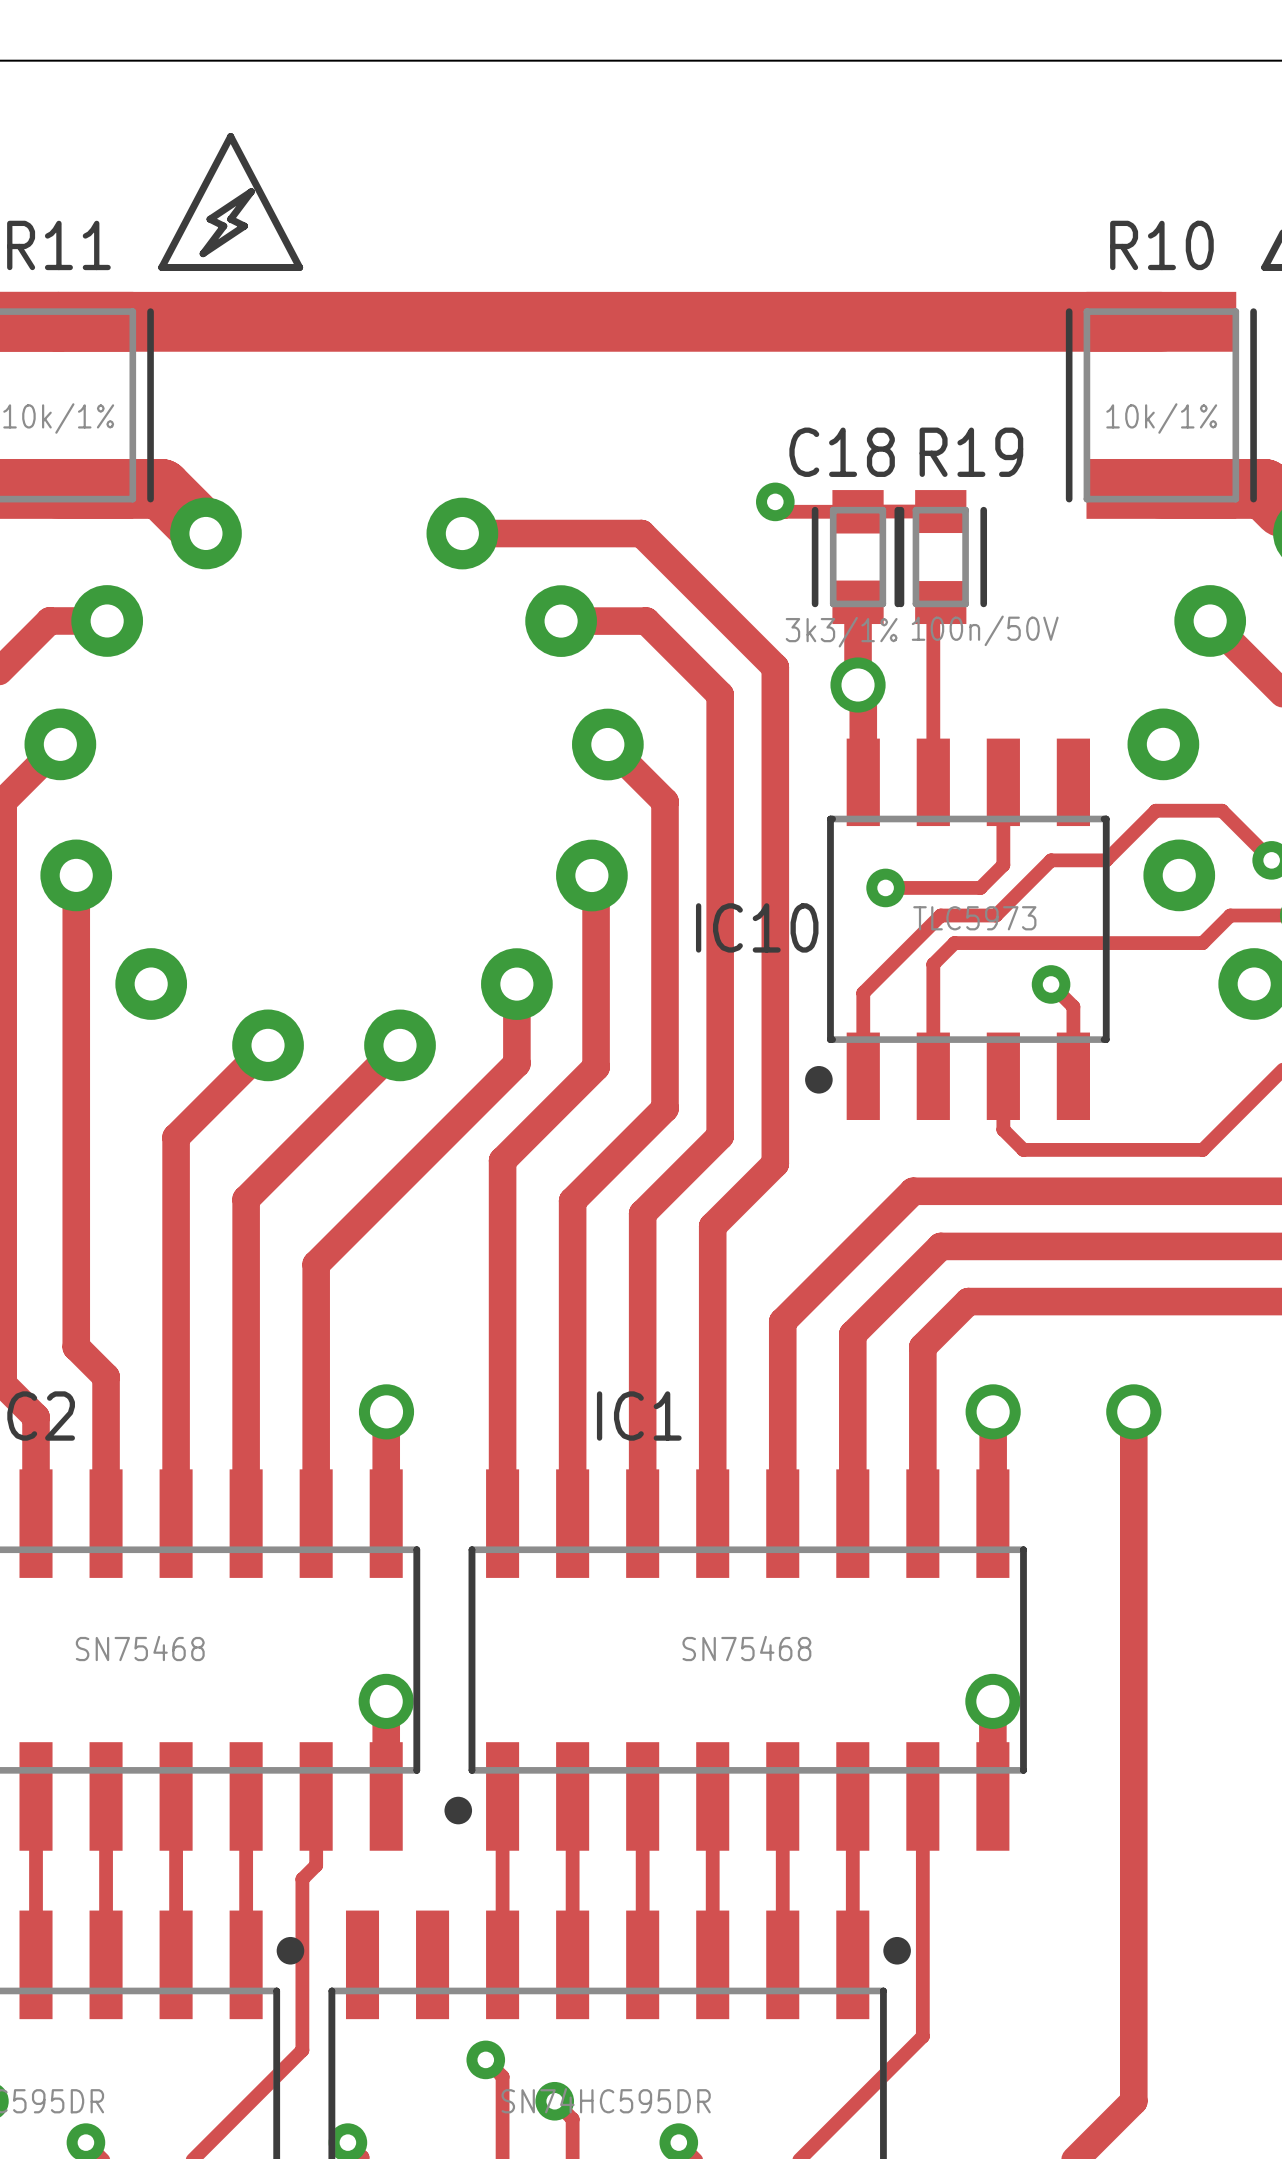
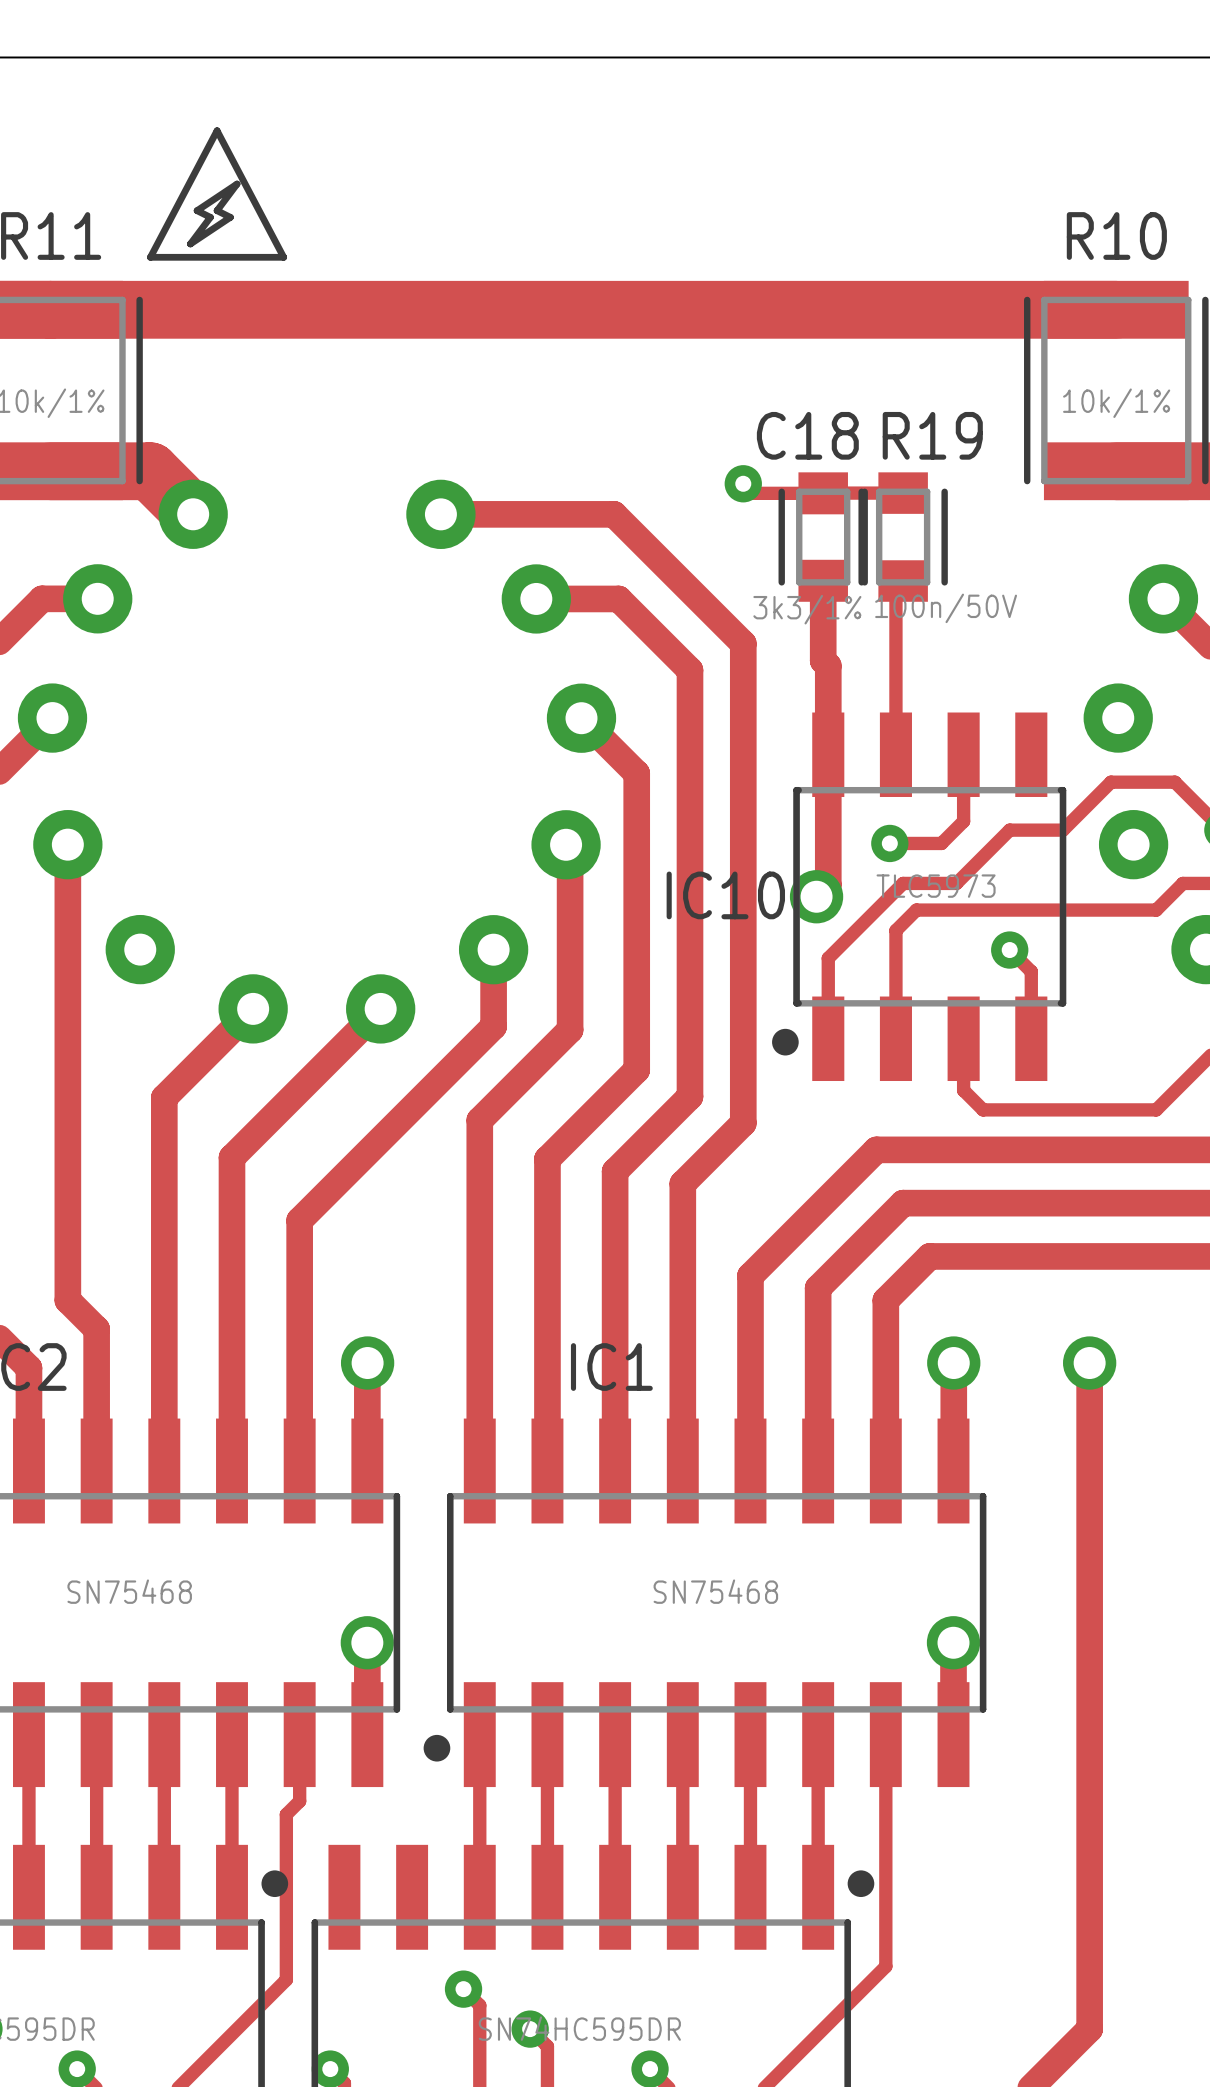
via position: (858, 685) -> (816, 896)
track: none -> (828, 754) (828, 885) (816, 896)
track: (1003, 851) (1003, 865) (980, 887) (885, 887) -> (963, 821) (941, 843) (889, 843)
via position: (885, 887) -> (889, 843)

